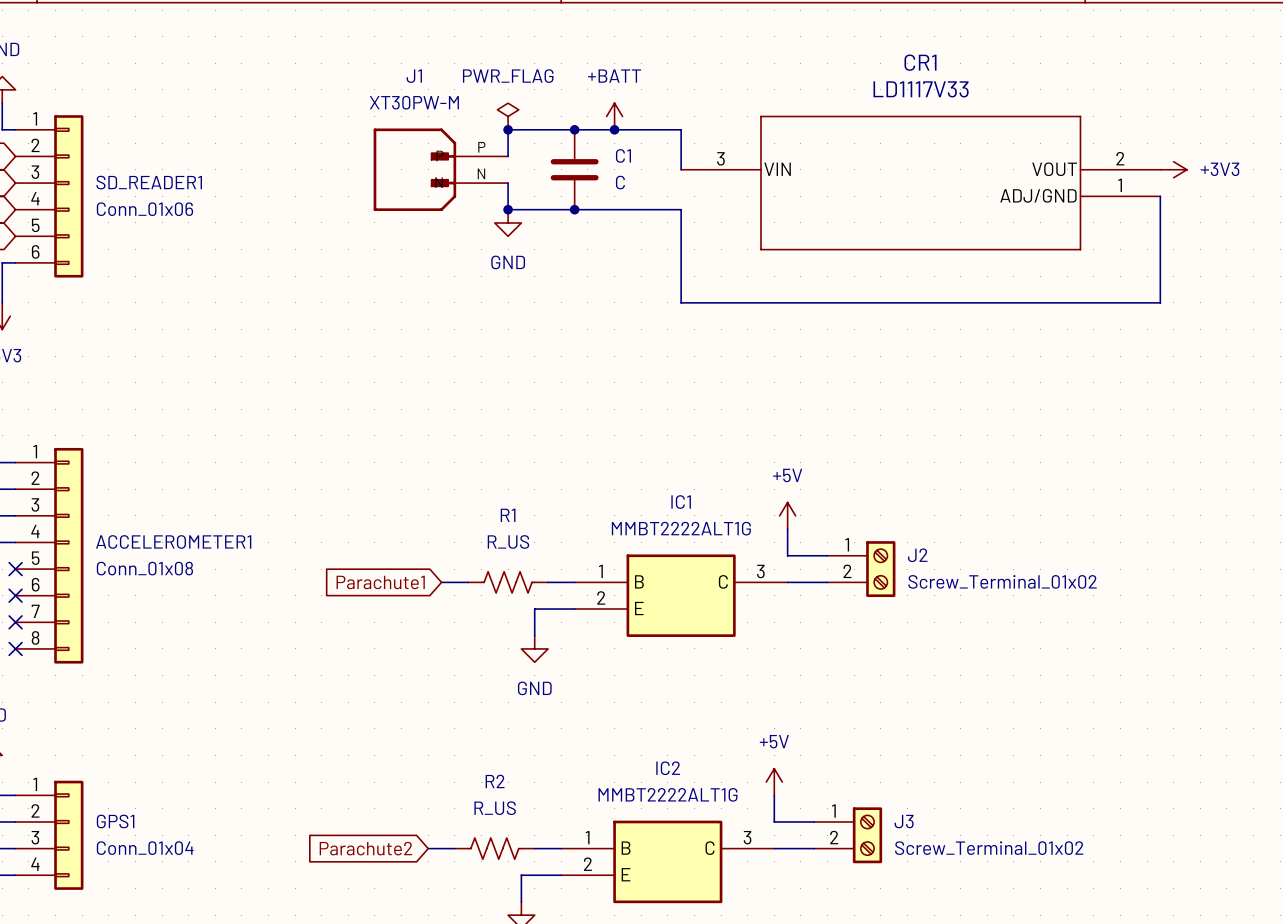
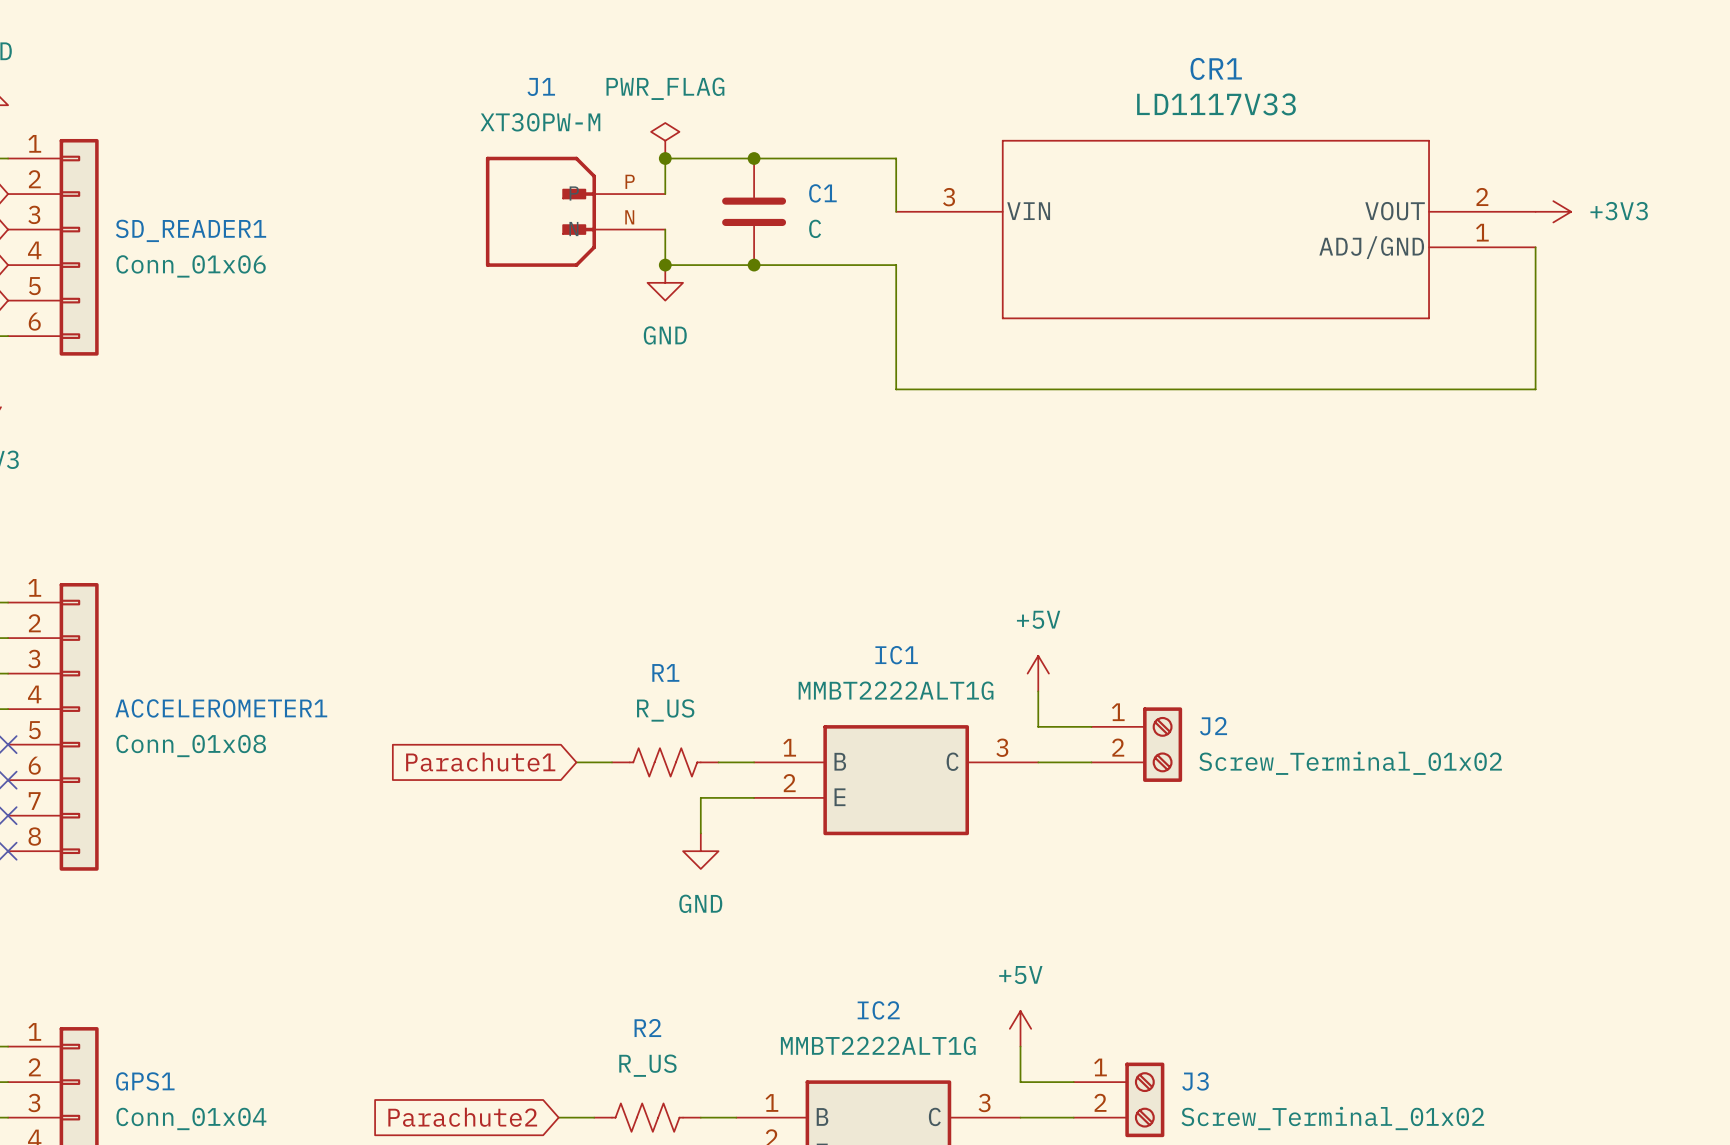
power symbol: +BATT (614, 116) -> none
junction: (614, 129) -> none

